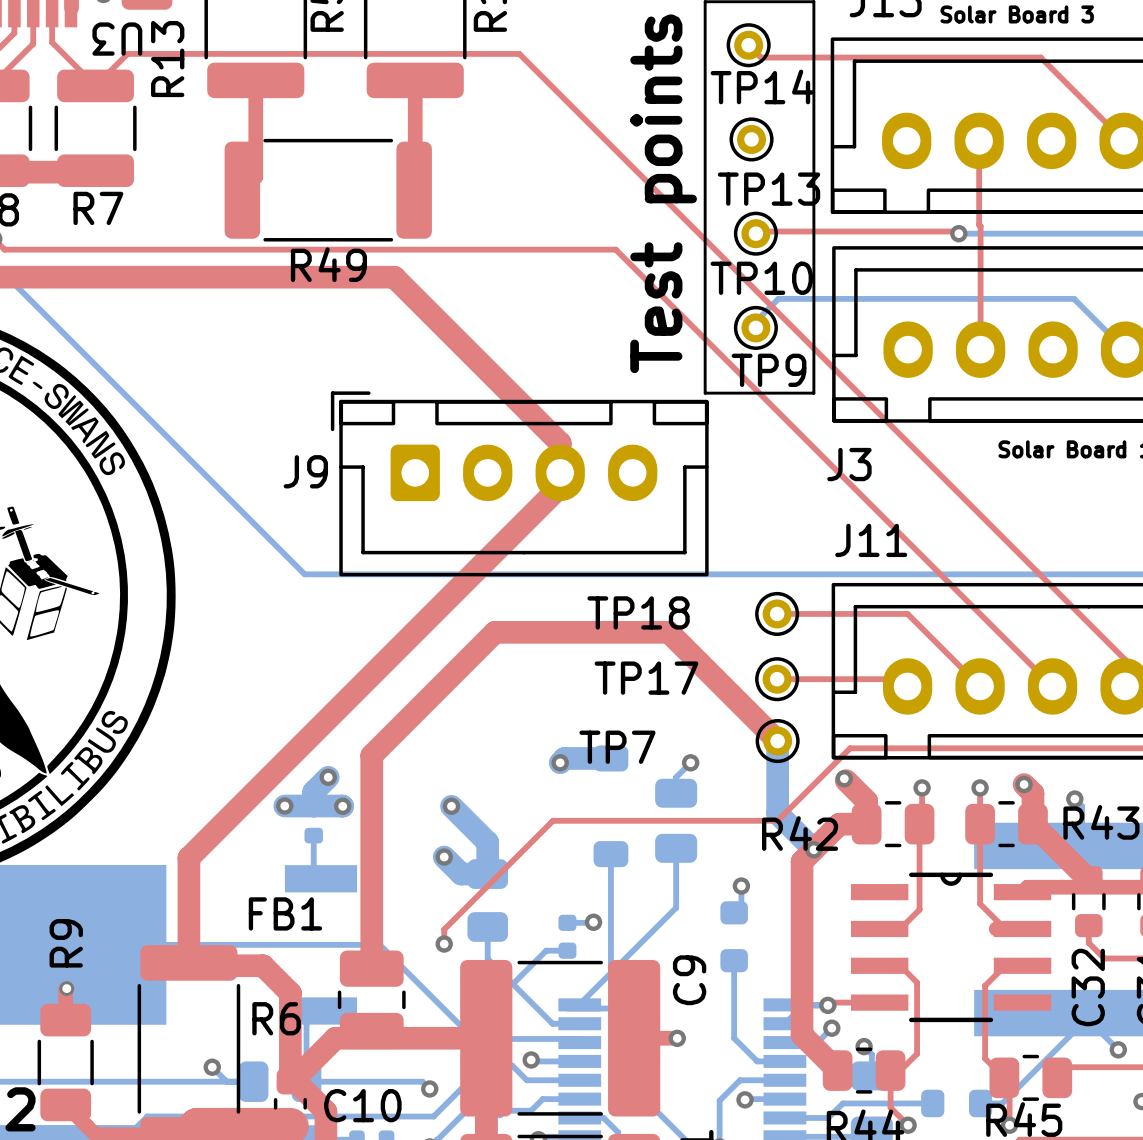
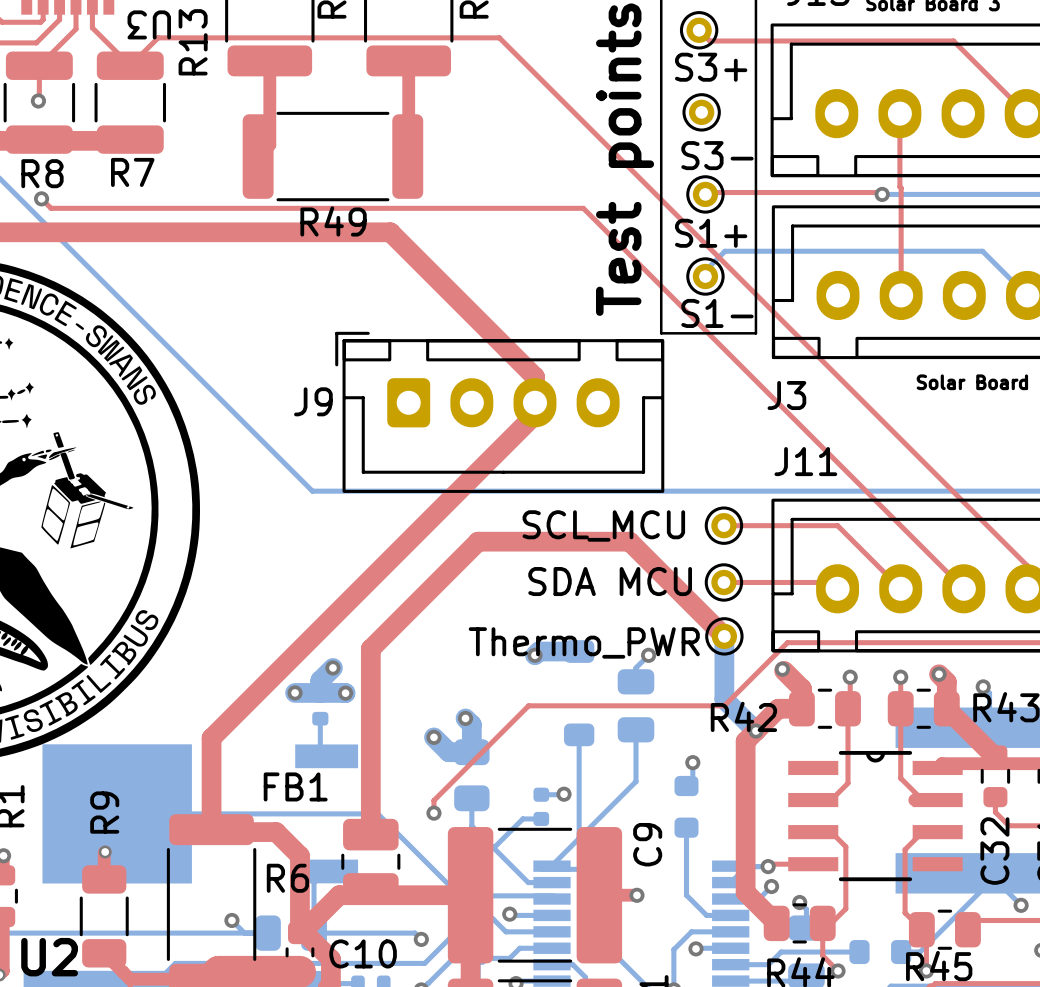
TP14 name: TP14 (762, 86) -> S3+ (711, 67)
TP13 name: TP13 (769, 189) -> S3- (717, 155)
TP10 name: TP10 (761, 278) -> S1+ (711, 233)
TP9 name: TP9 (769, 370) -> S1- (717, 313)
TP18 name: TP18 (638, 612) -> SCL_MCU (603, 525)
TP17 name: TP17 (646, 678) -> SDA MCU (610, 581)
TP7 name: TP7 (617, 747) -> Thermo_PWR (584, 642)
bottom track: (451, 806) (480, 835) -> none
via position: (451, 806) -> (465, 718)

